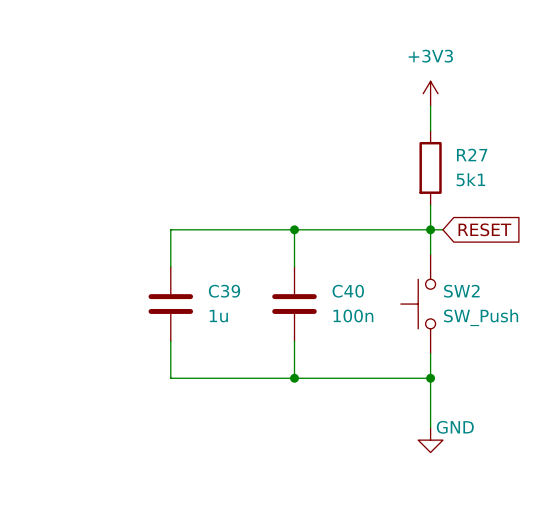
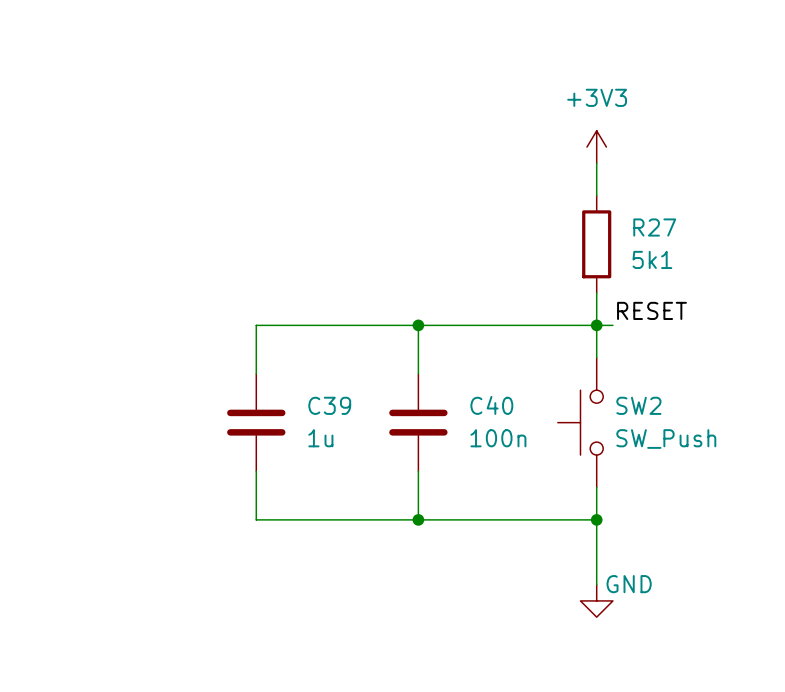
label: none -> RESET (652, 310)
global label: RESET (484, 229) -> none

